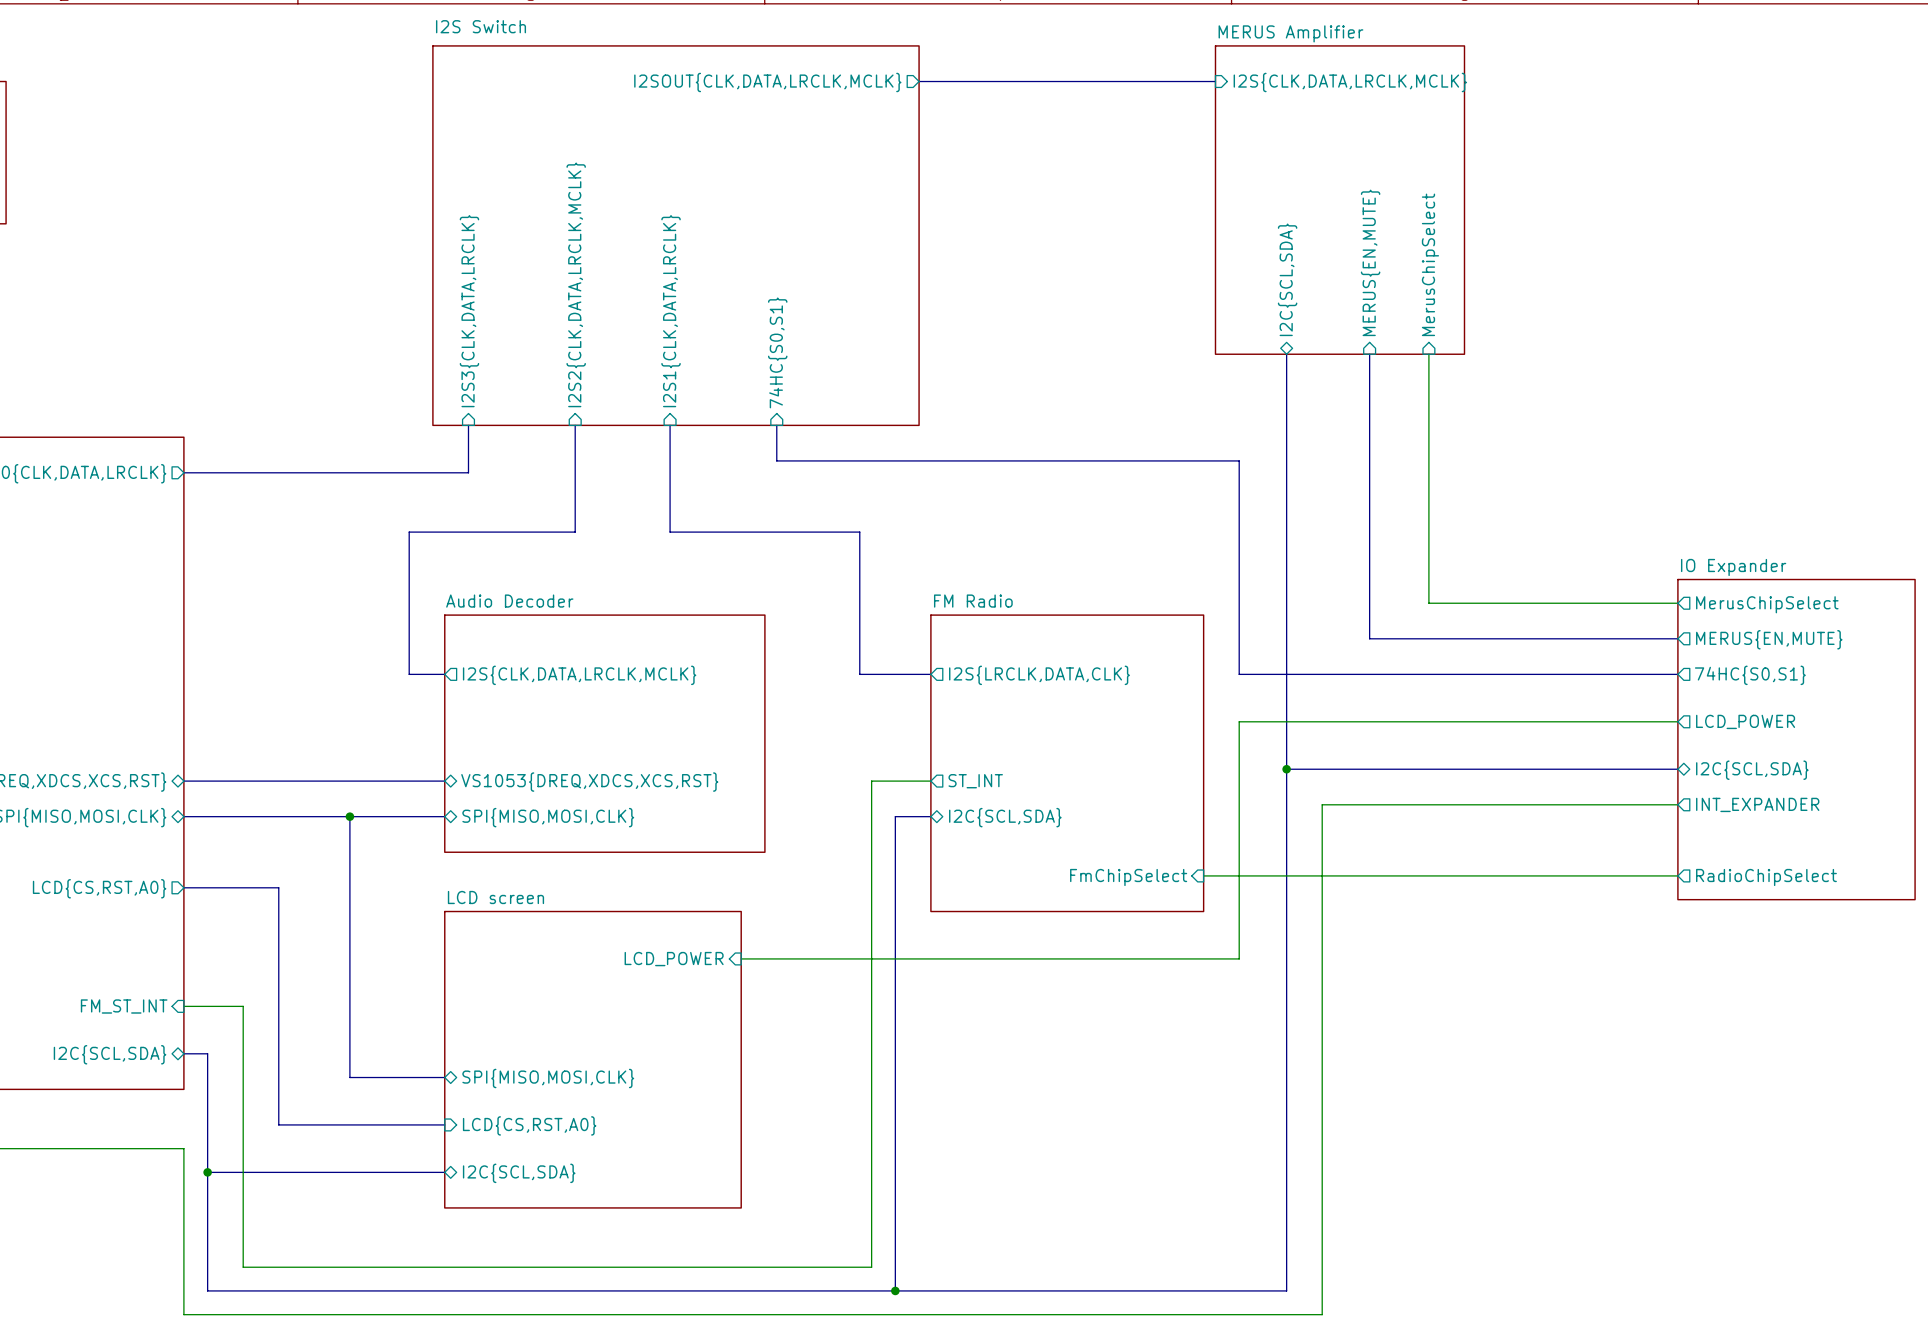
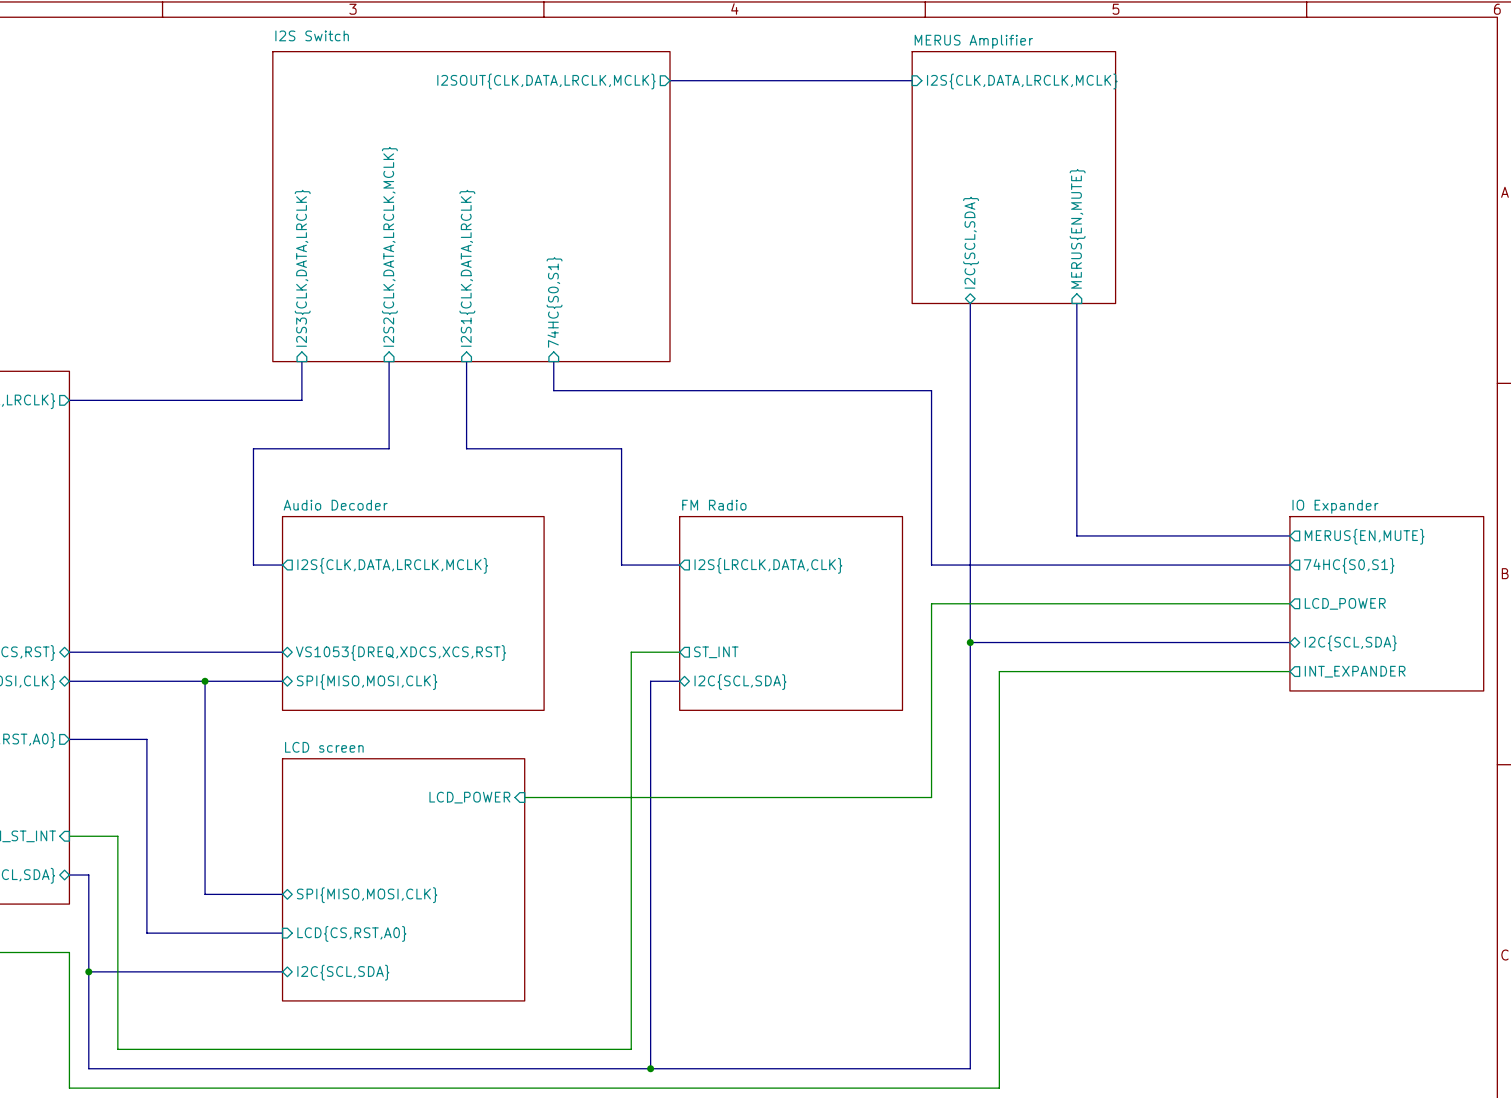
sheet pin position: MERUS{EN,MUTE} (1370, 262) -> MERUS{EN,MUTE} (1077, 228)
sheet pin: MerusChipSelect (1430, 264) -> none
bus: (1369, 354) (1369, 638) (1417, 638) -> (1076, 303) (1076, 535)
wire: (1428, 354) (1428, 603) (1677, 603) -> none
sheet pin: MerusChipSelect (1767, 604) -> none
sheet IO Expander: none -> (1386, 603)
sheet FM Radio: none -> (791, 613)
sheet IO Expander: (1796, 739) -> none
sheet FM Radio: (1067, 763) -> none
wire: (1203, 875) (1677, 875) -> none
sheet pin: FmChipSelect (1128, 877) -> none
sheet pin: RadioChipSelect (1766, 877) -> none

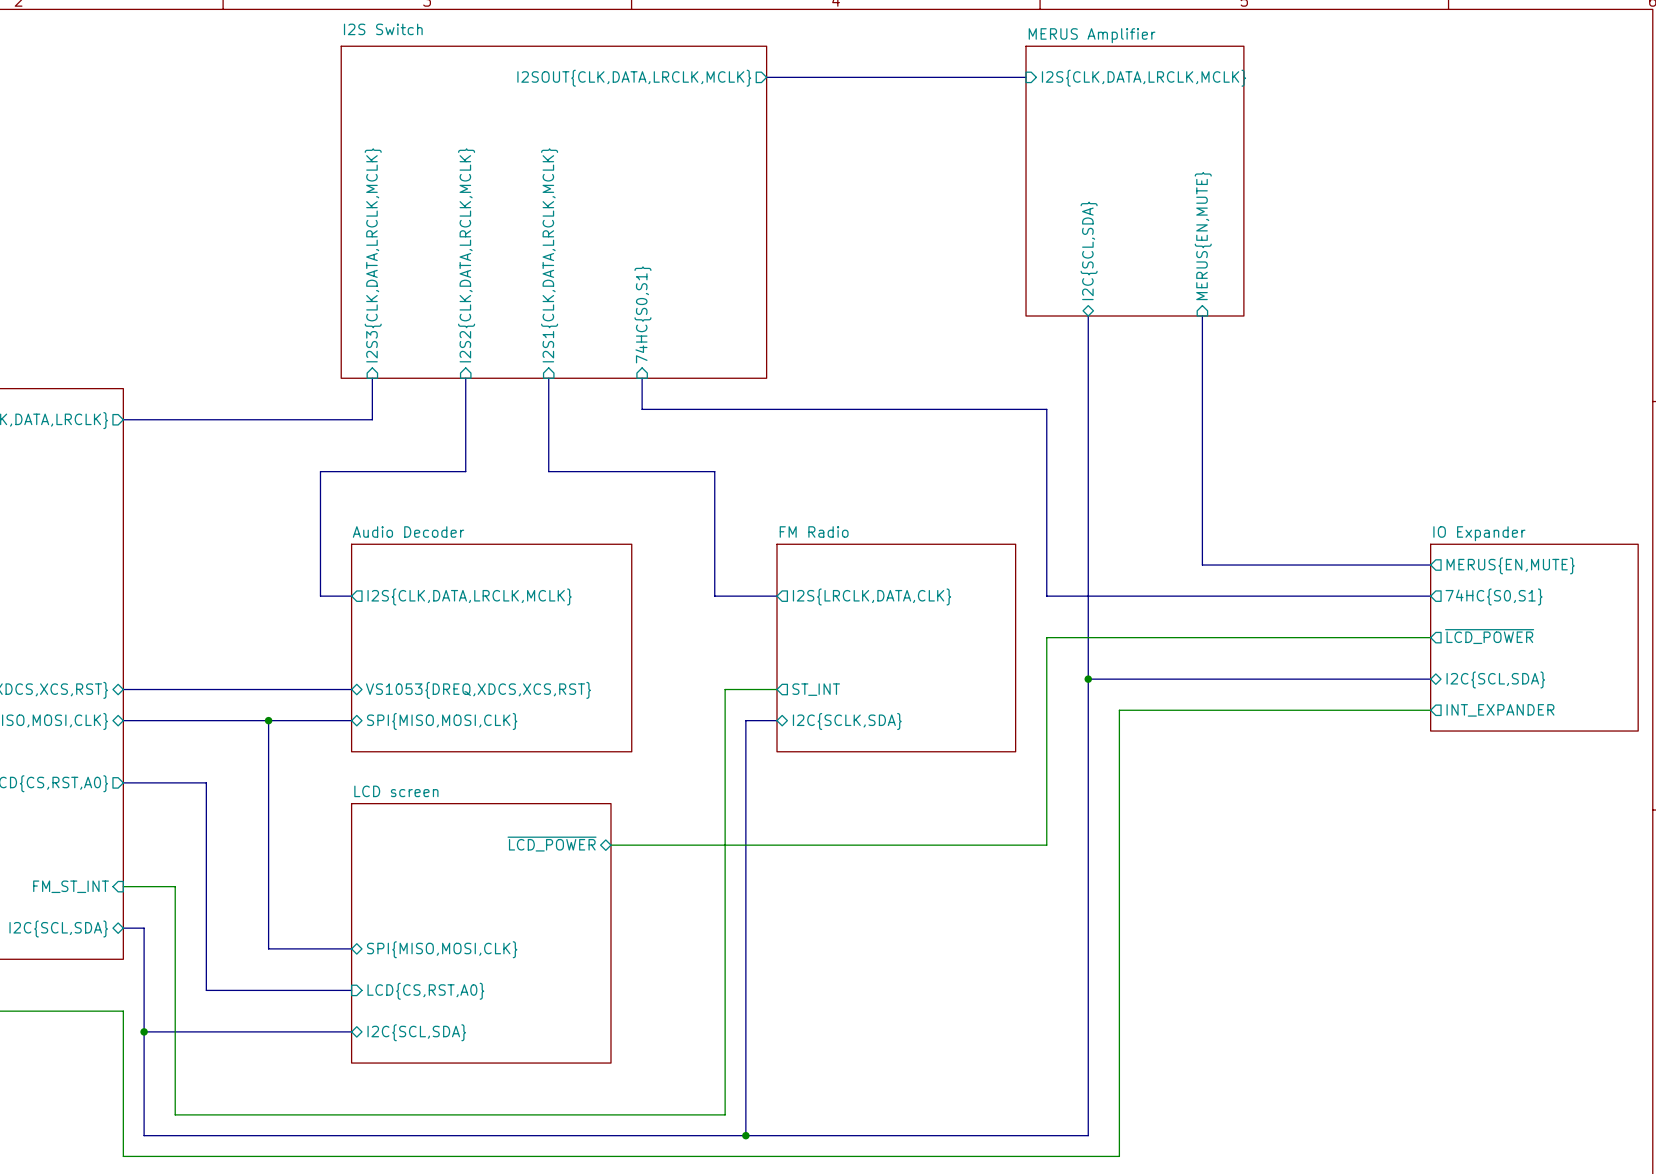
sheet pin: I2S3{CLK,DATA,LRCLK} (302, 268) -> I2S3{CLK,DATA,LRCLK,MCLK} (373, 255)
sheet pin: I2S1{CLK,DATA,LRCLK} (467, 268) -> I2S1{CLK,DATA,LRCLK,MCLK} (549, 255)
sheet pin: LCD_POWER (1345, 603) -> ~{LCD_POWER} (1489, 636)
sheet pin: I2C{SCL,SDA} (740, 682) -> I2C{SCLK,SDA} (847, 721)
sheet pin shape: input (469, 797) -> bidirectional (552, 844)
sheet pin: LCD_POWER (469, 797) -> ~{LCD_POWER} (552, 844)

